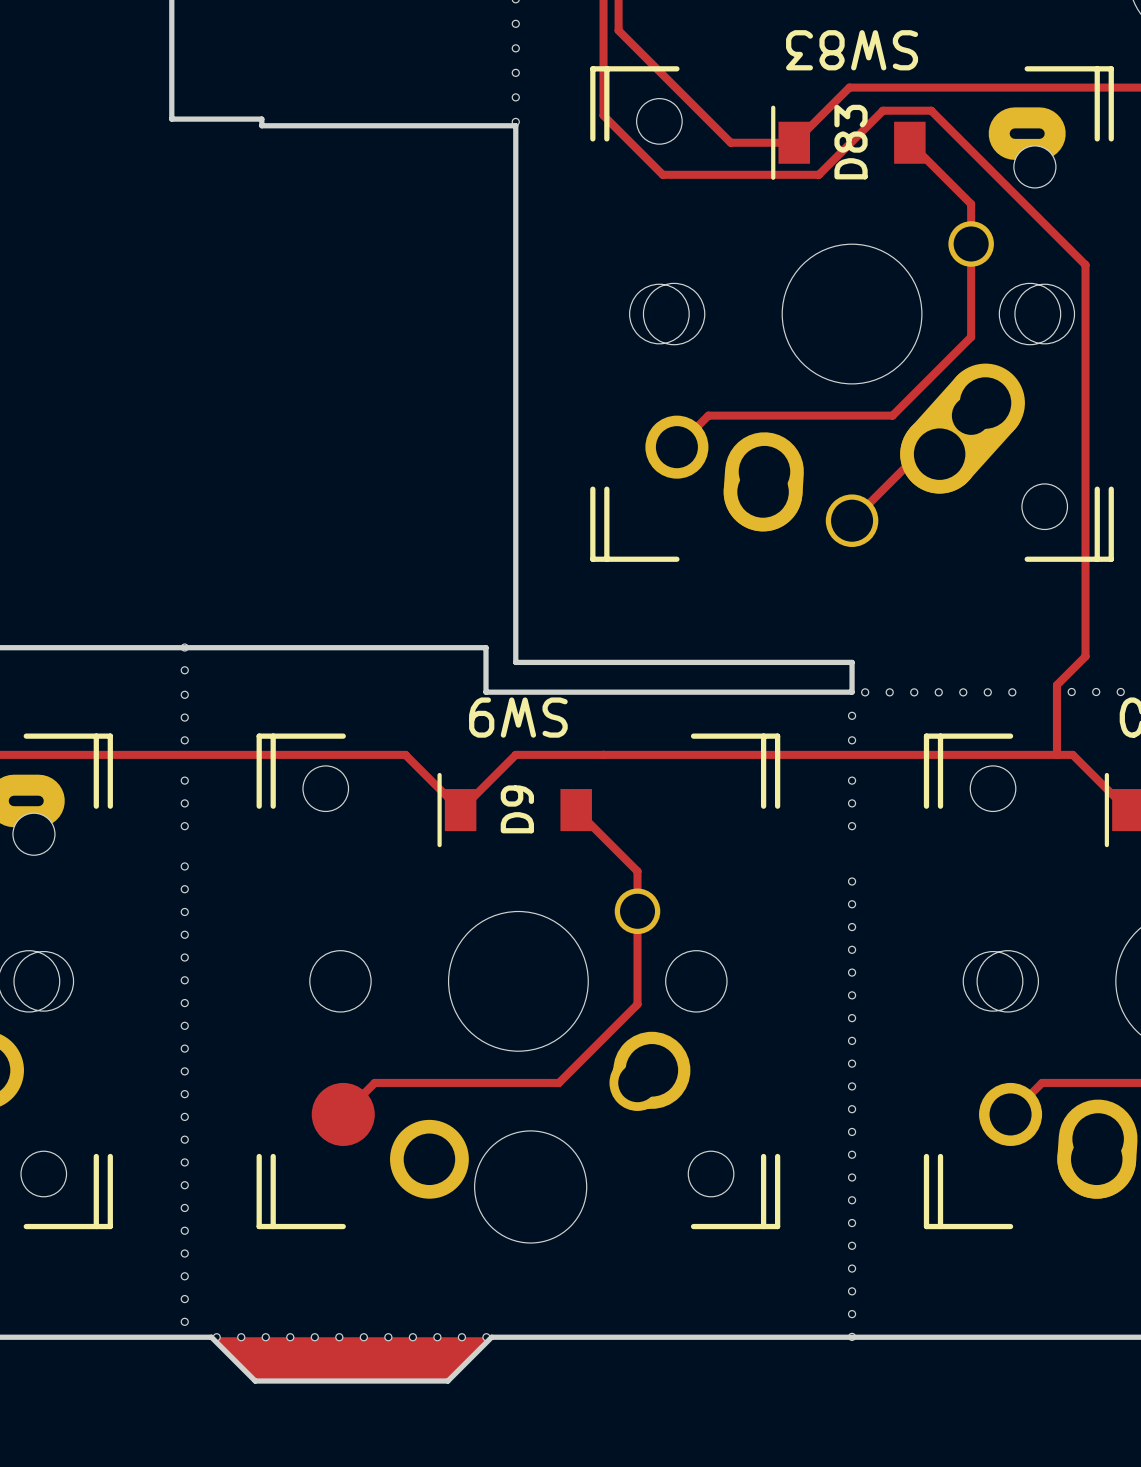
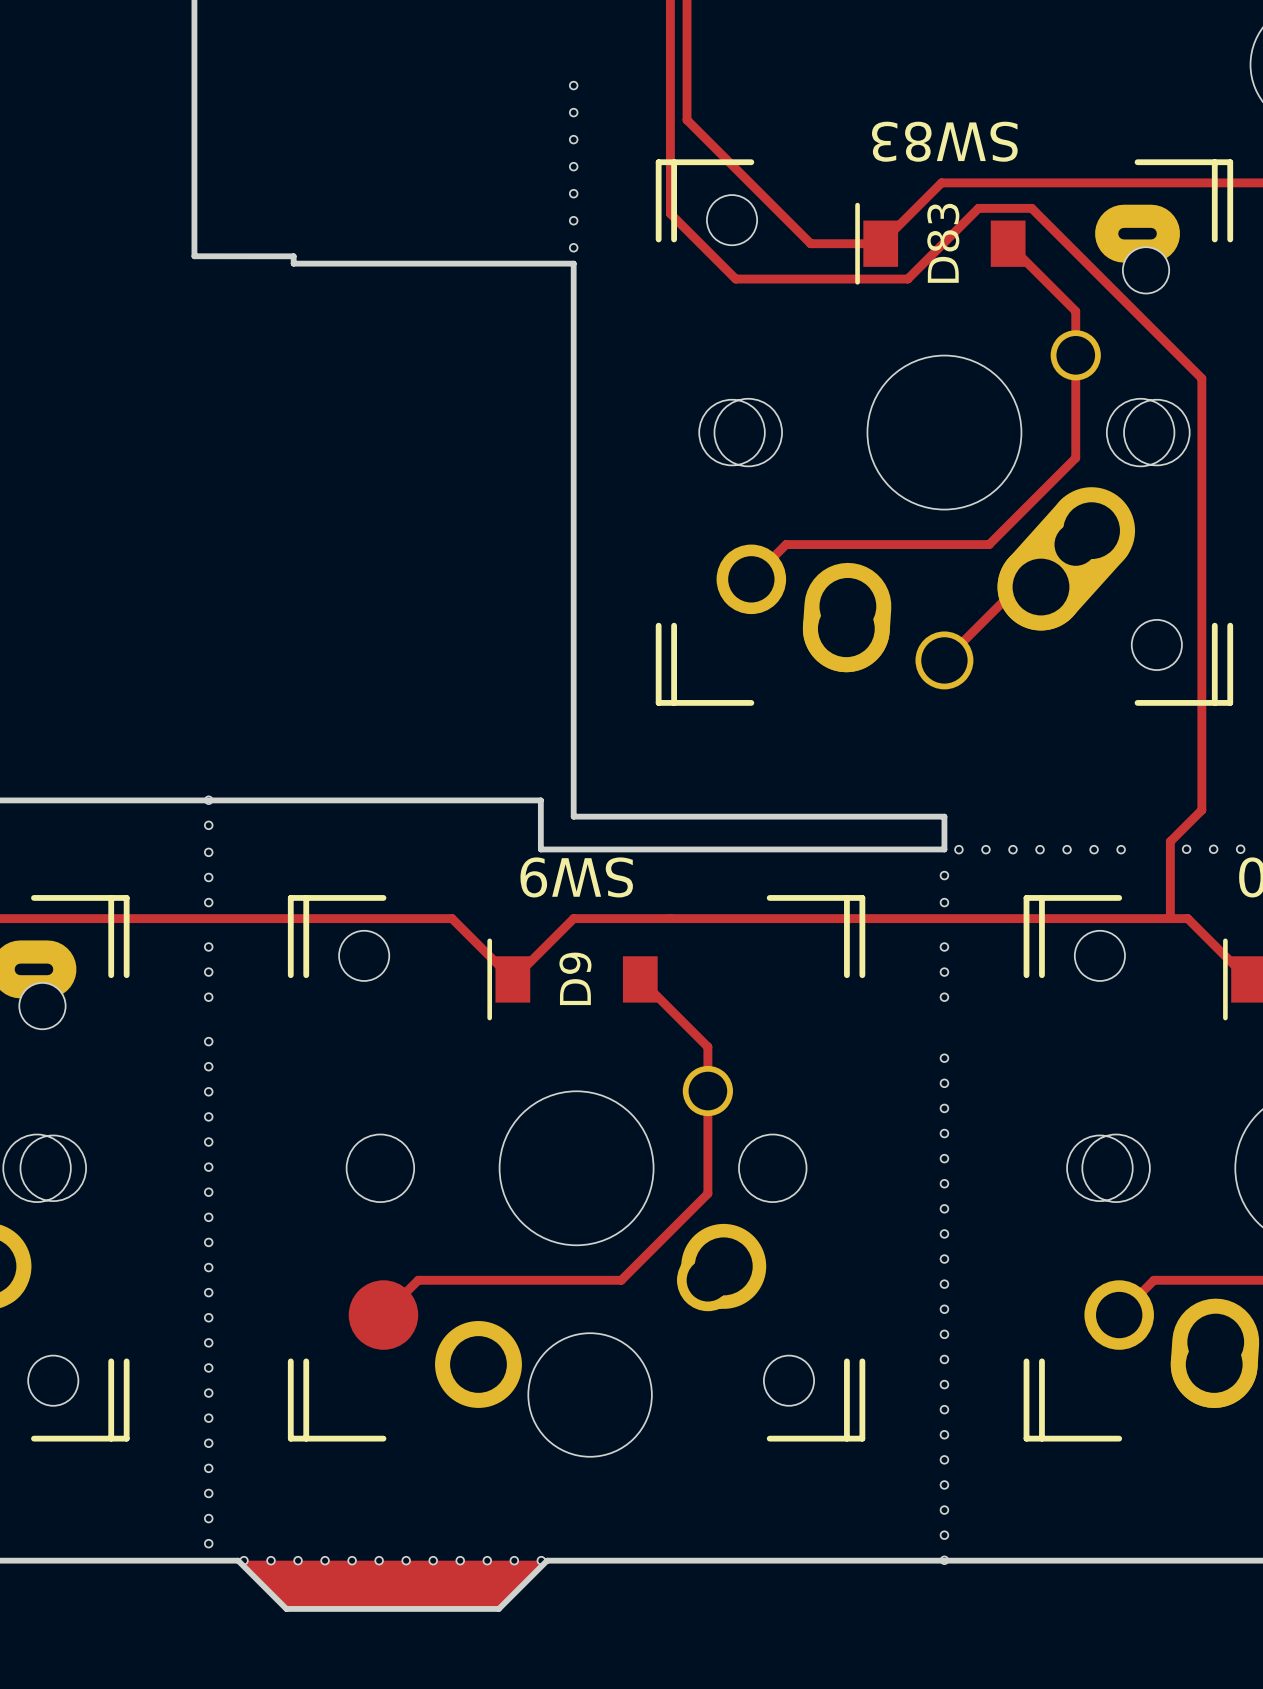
board edge: (171, 119) (261, 119) (261, 125) (515, 125) (515, 160) -> (194, 217) (194, 256) (293, 256) (293, 263) (573, 263)
part: none -> (573, 247)

